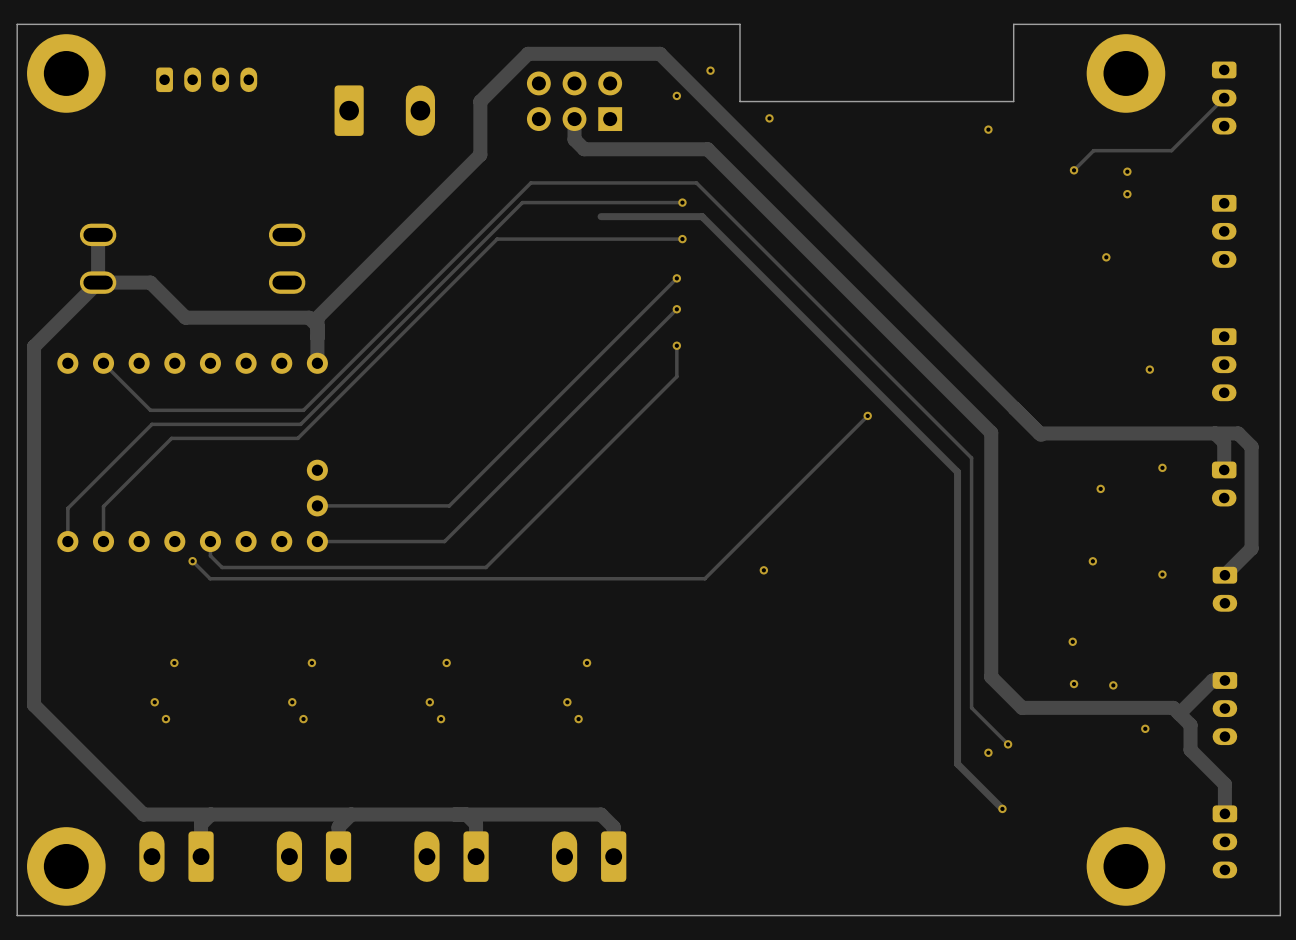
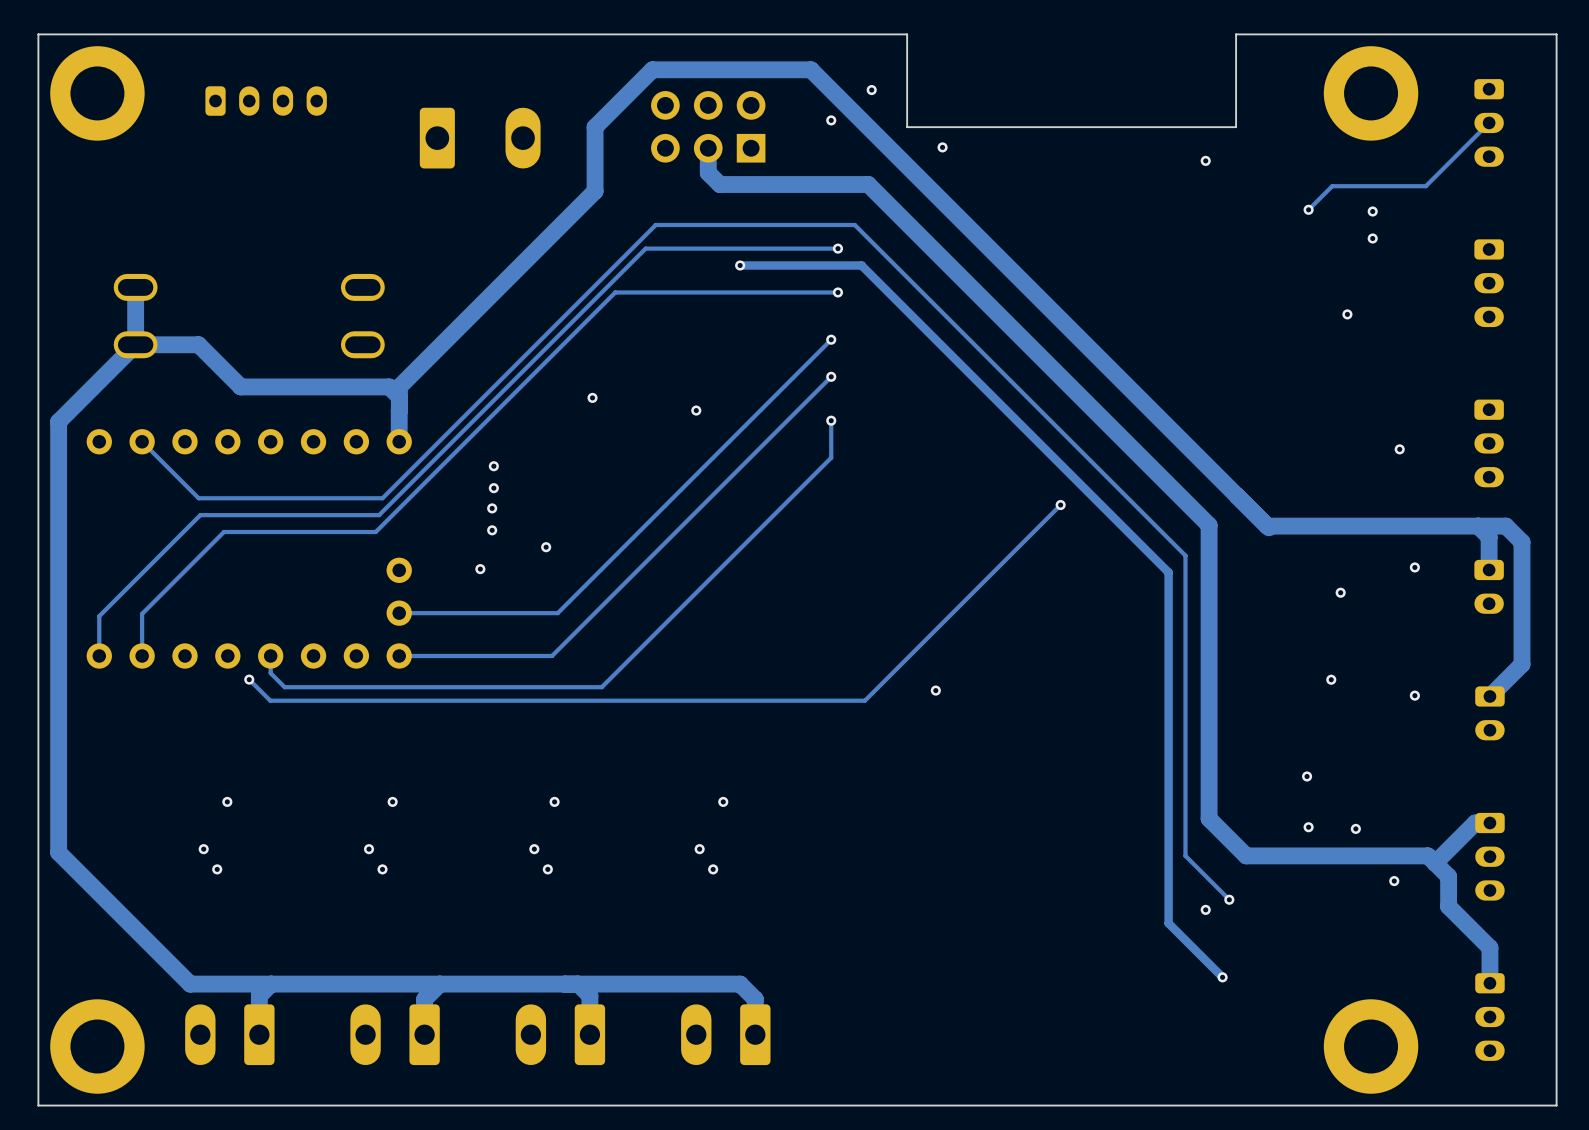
via: none -> (740, 265)
via: none -> (592, 397)
via: none -> (696, 410)
via: none -> (493, 466)
via: none -> (493, 488)
via: none -> (492, 508)
via: none -> (492, 530)
via: none -> (546, 547)
via: none -> (480, 569)

